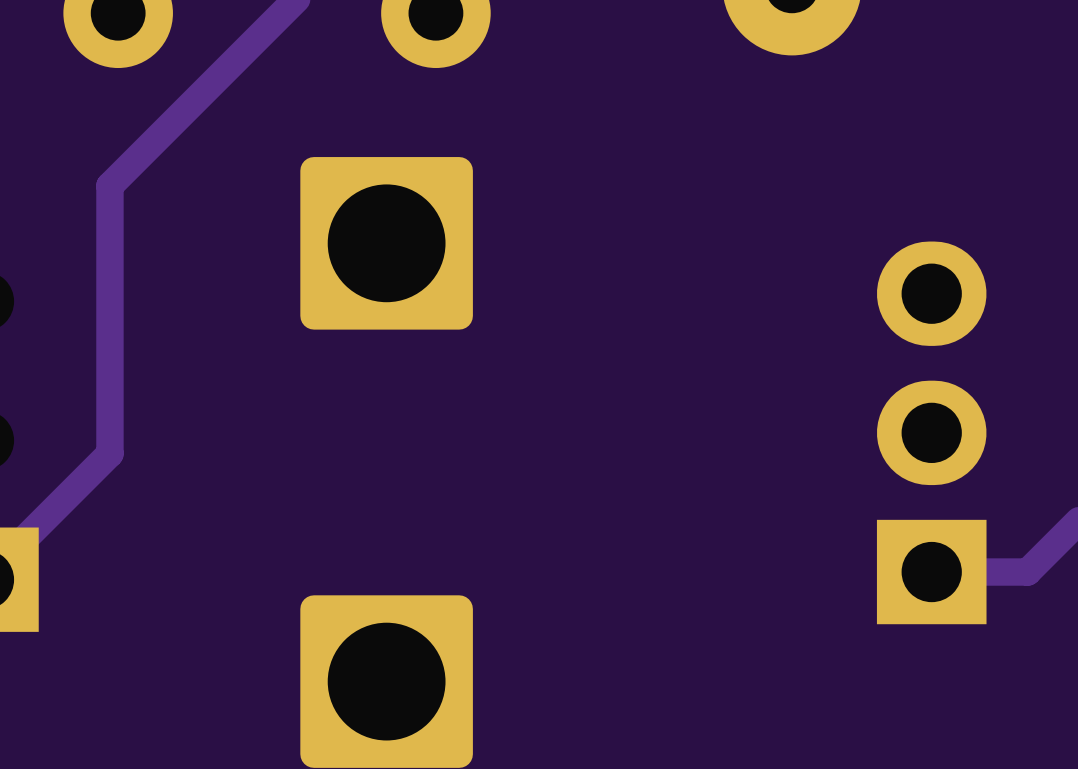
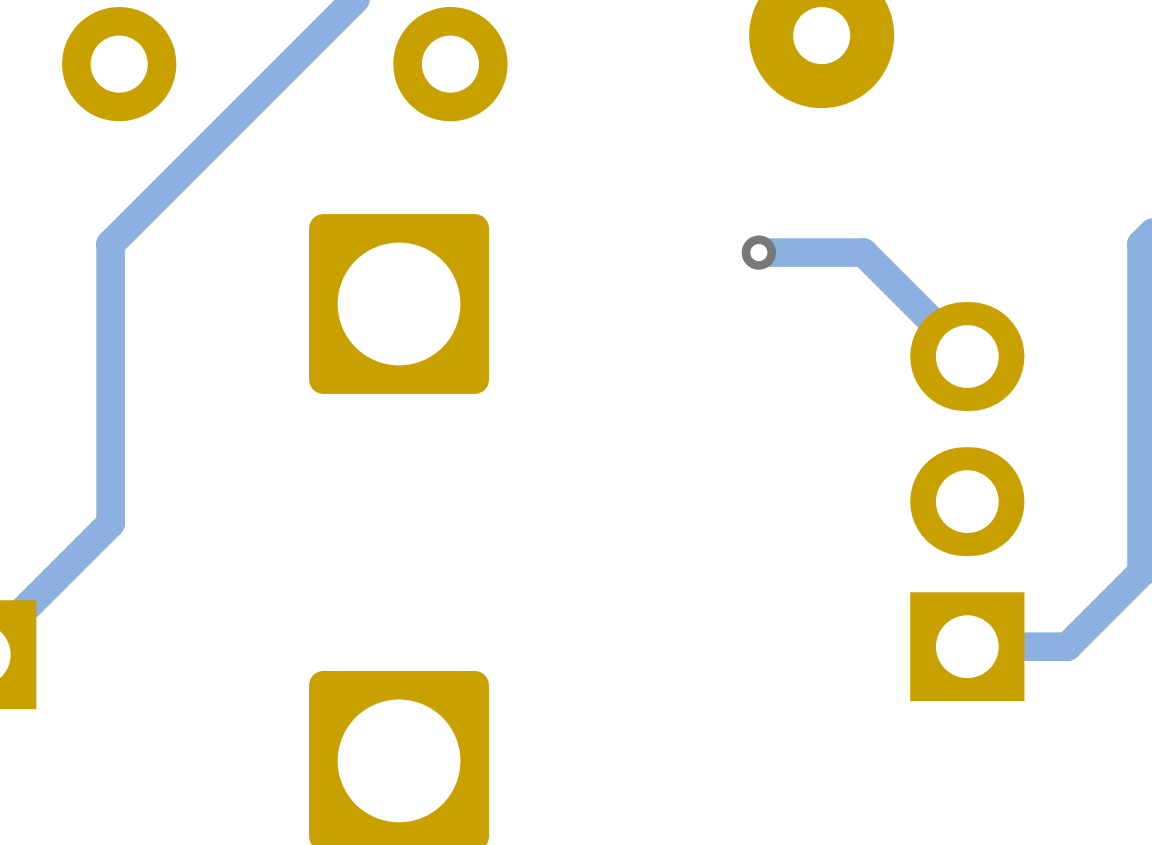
track: none -> (758, 252) (863, 252) (967, 356)
via: none -> (758, 252)

